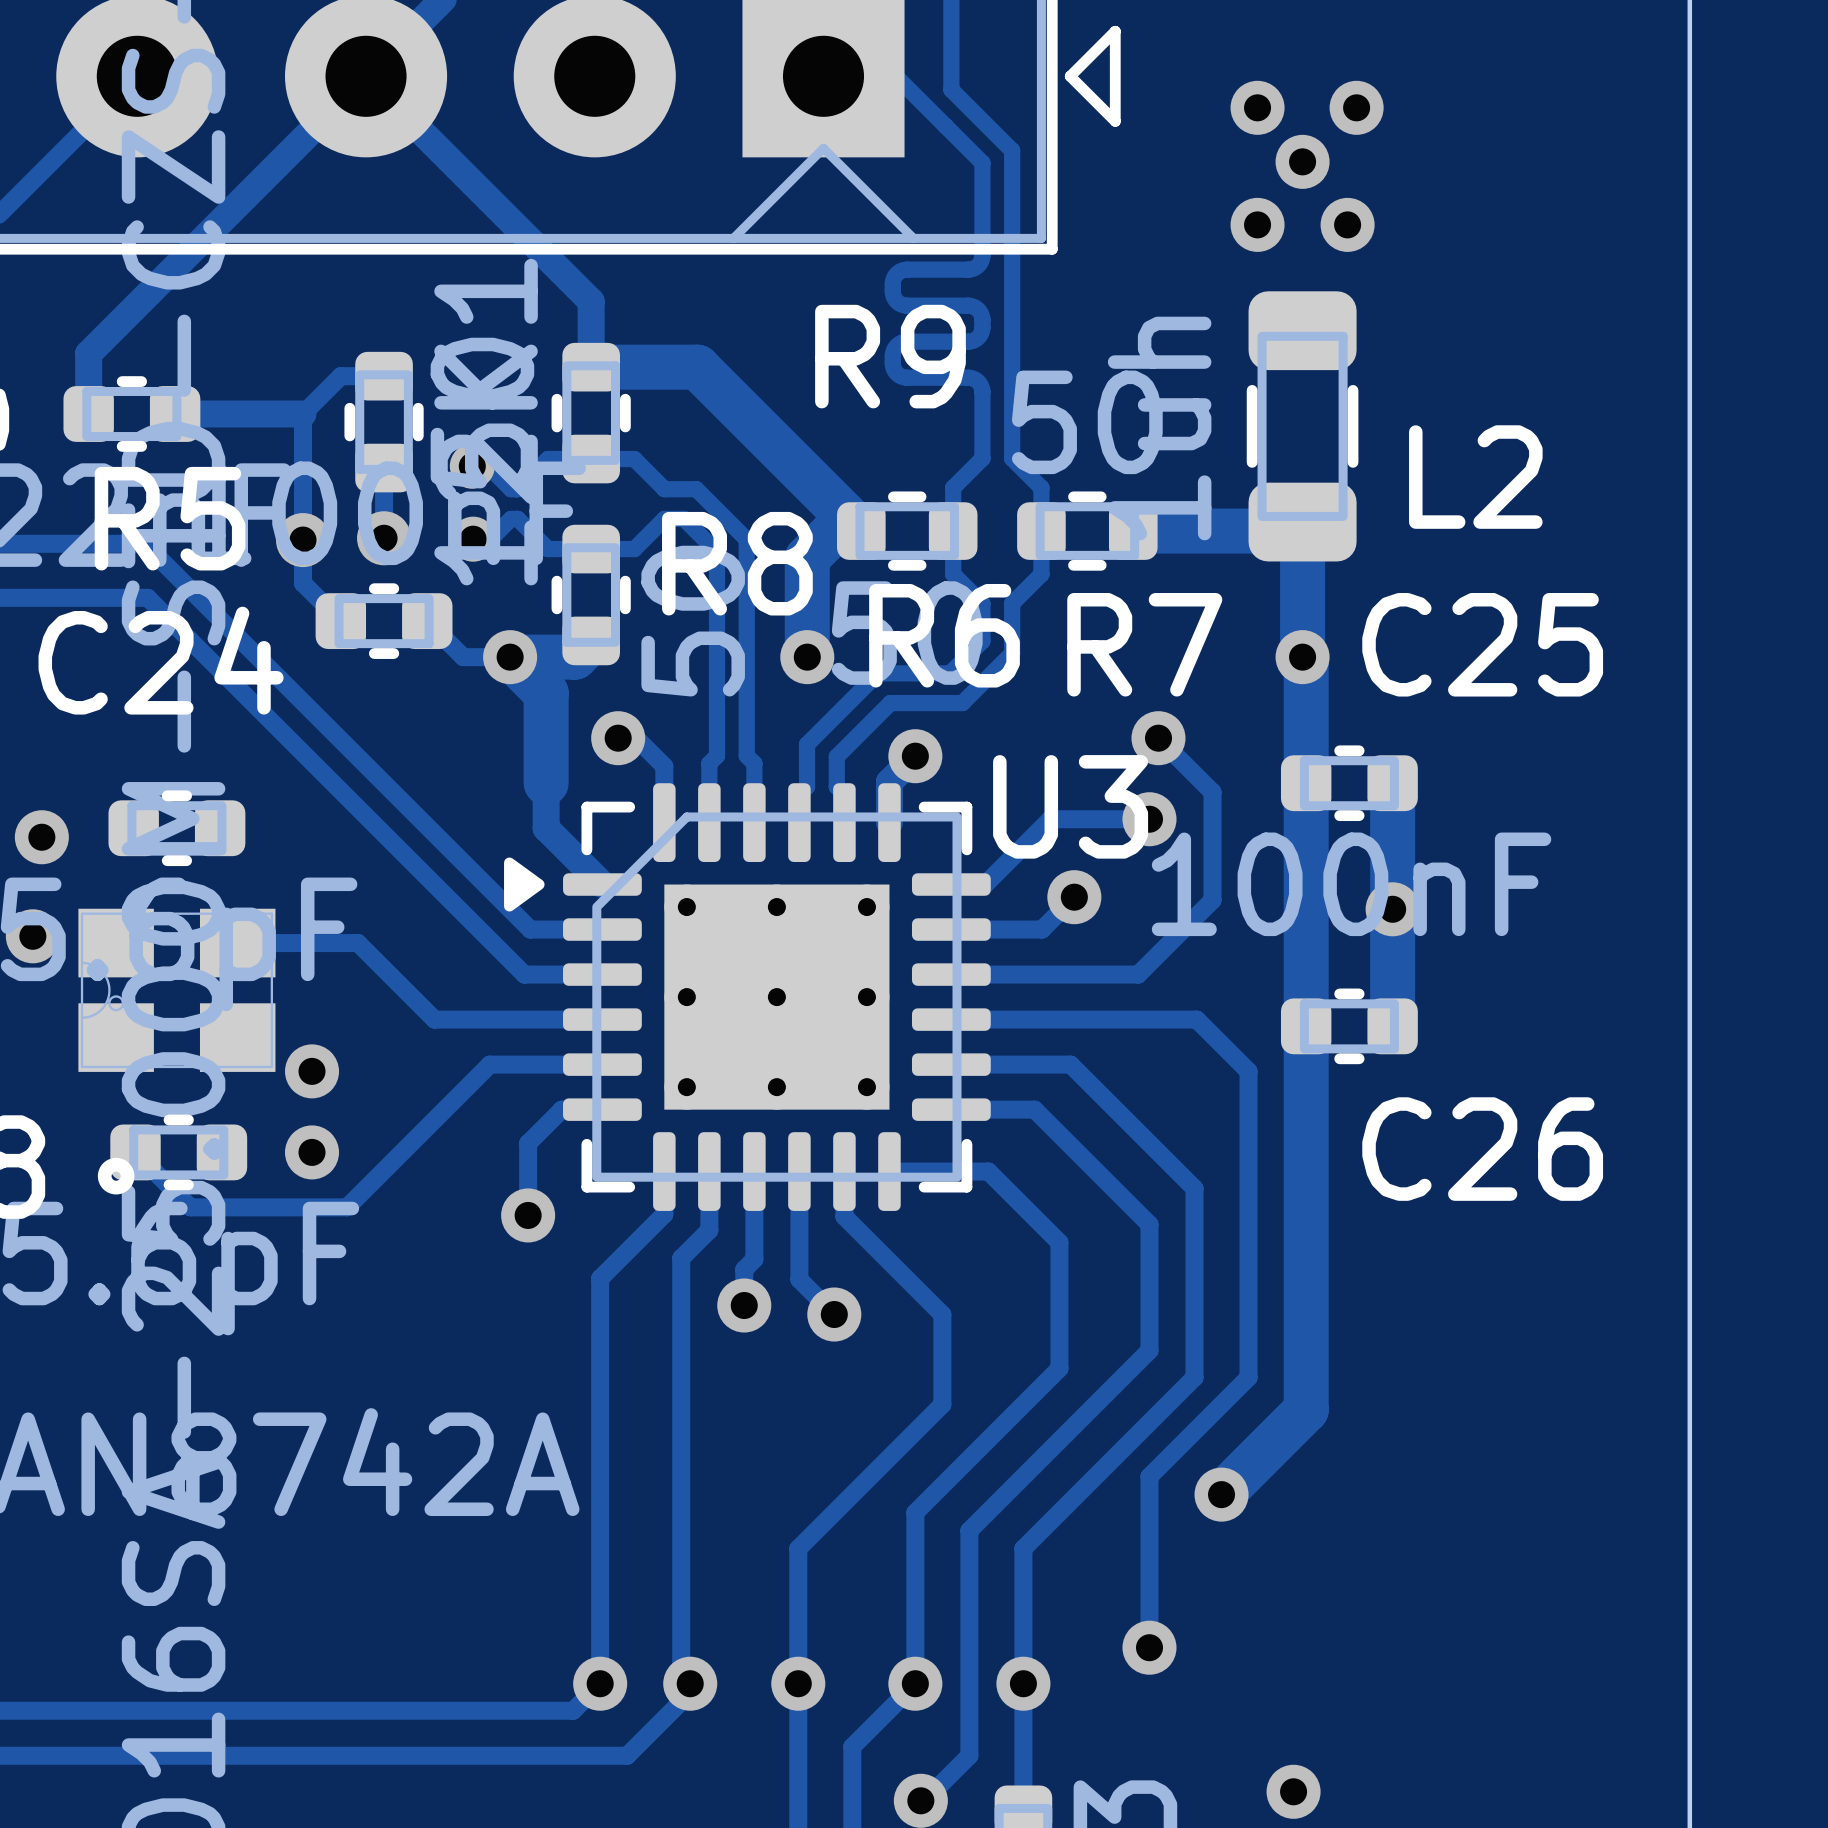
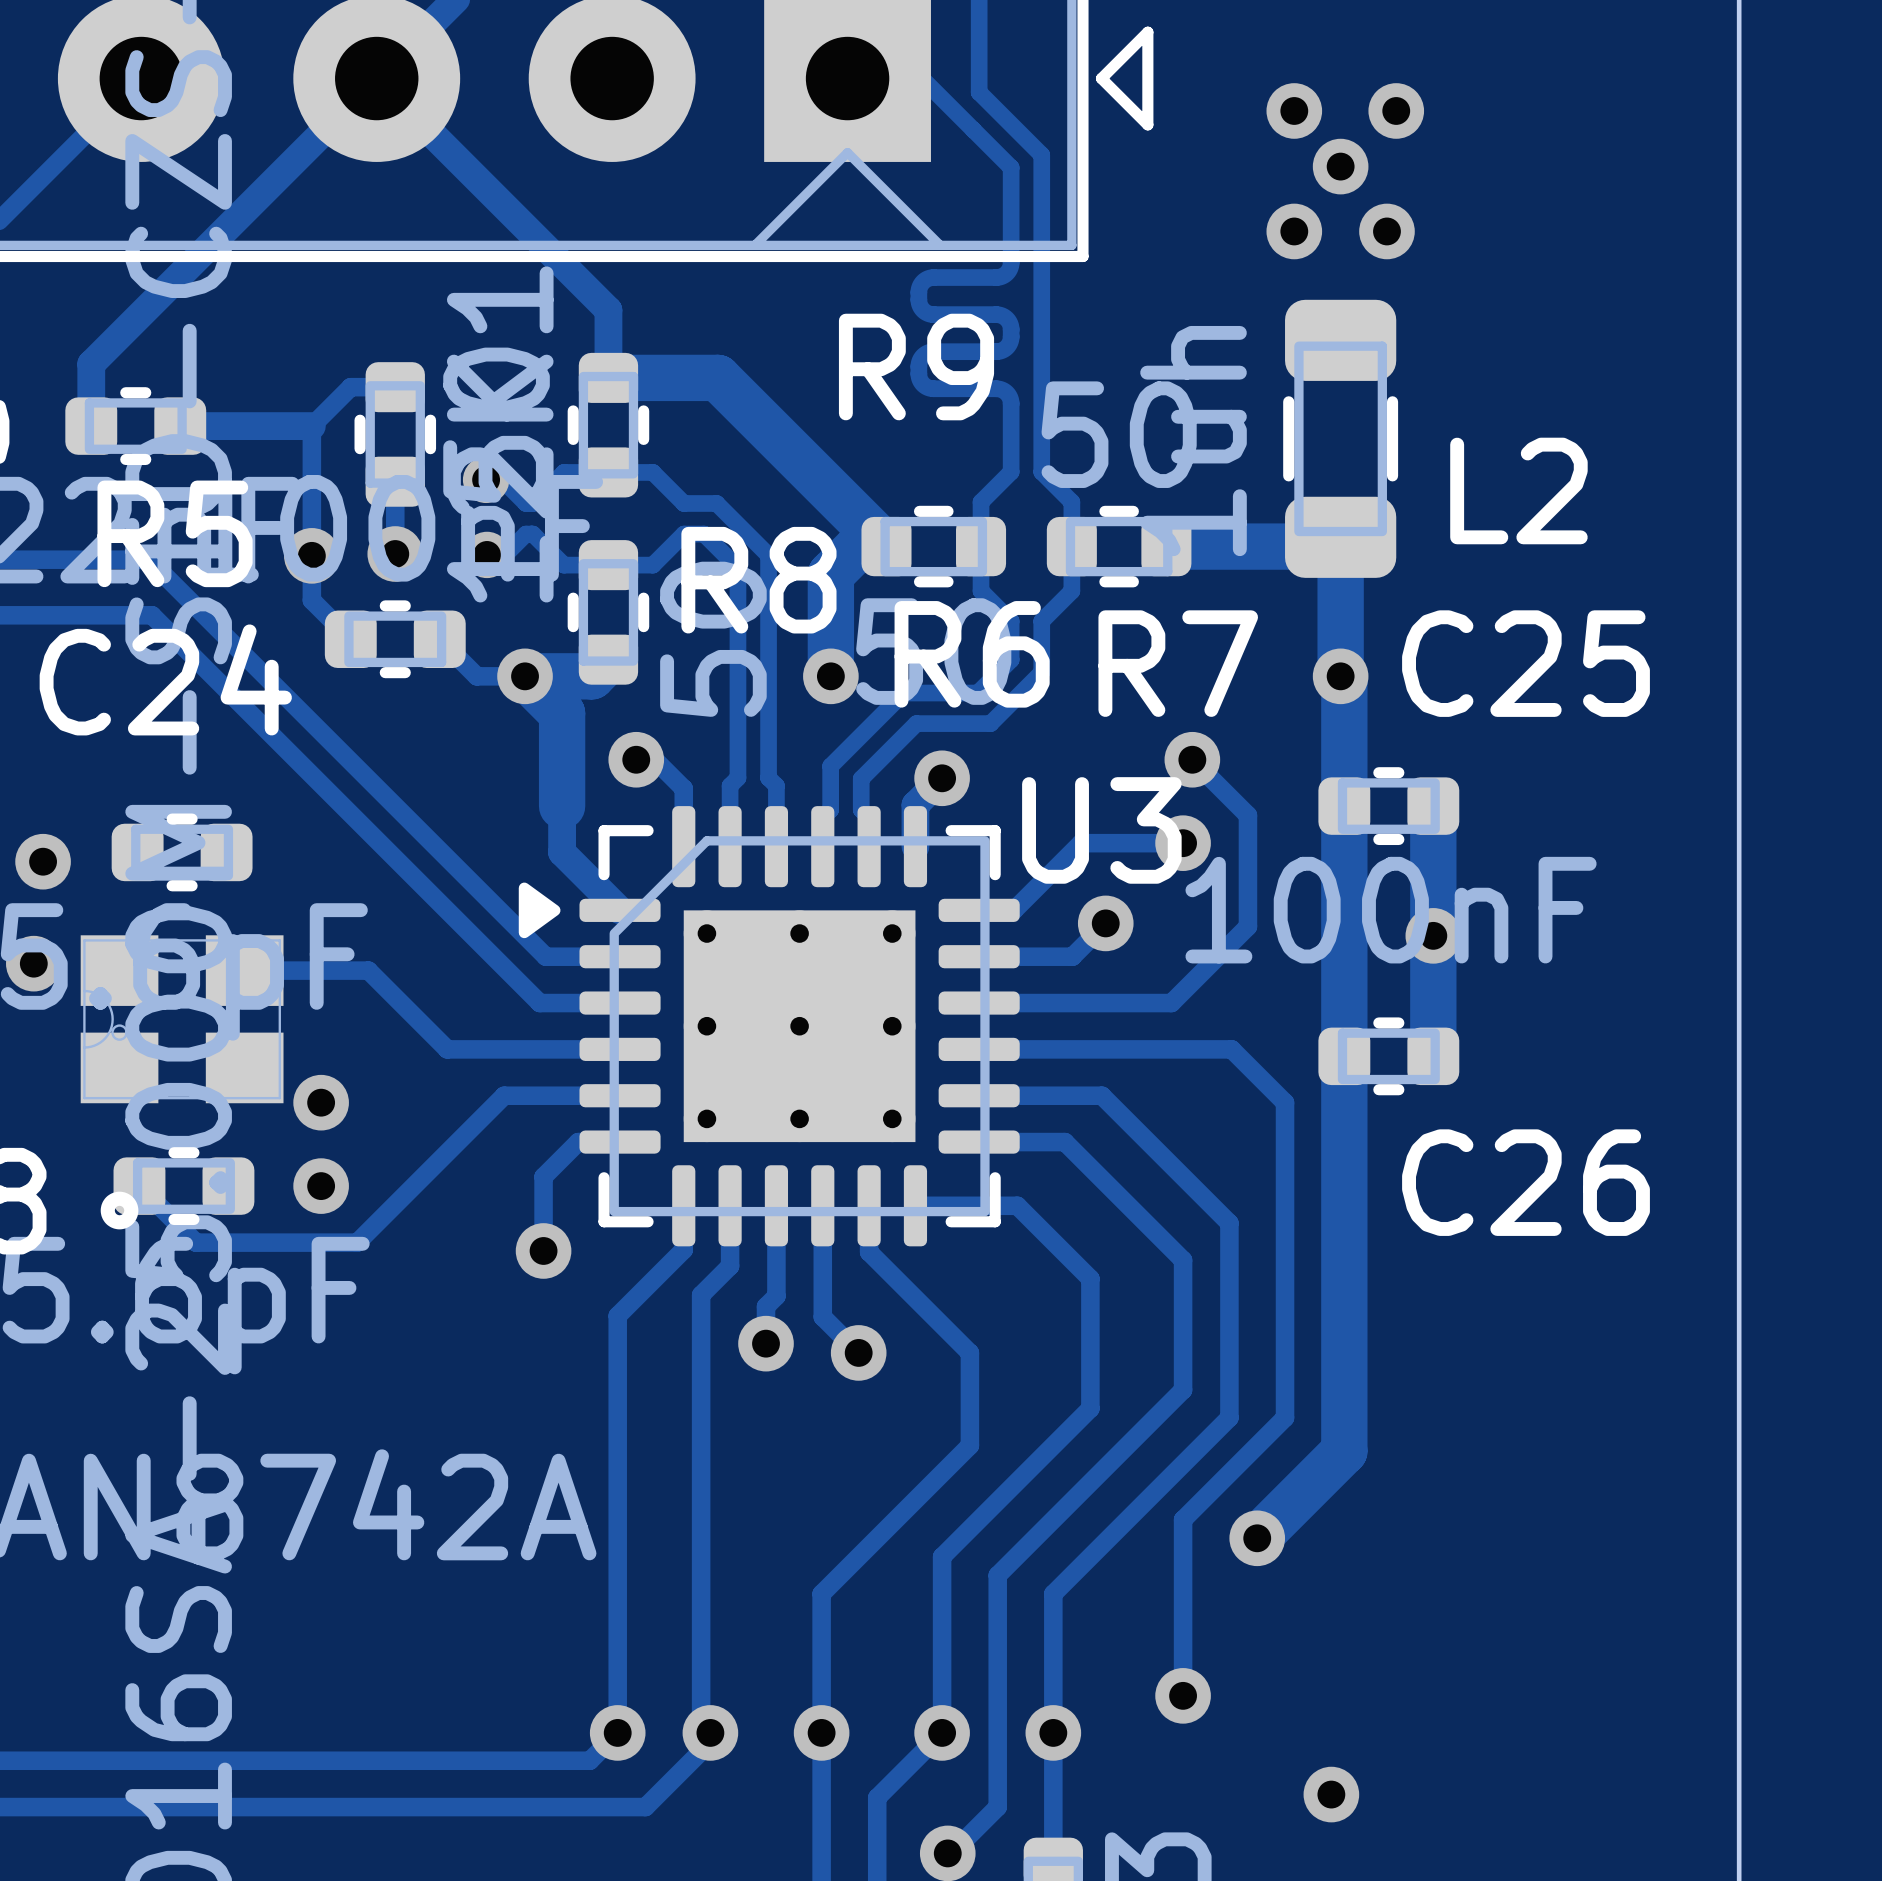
via position: (1293, 1791) -> (1331, 1794)

